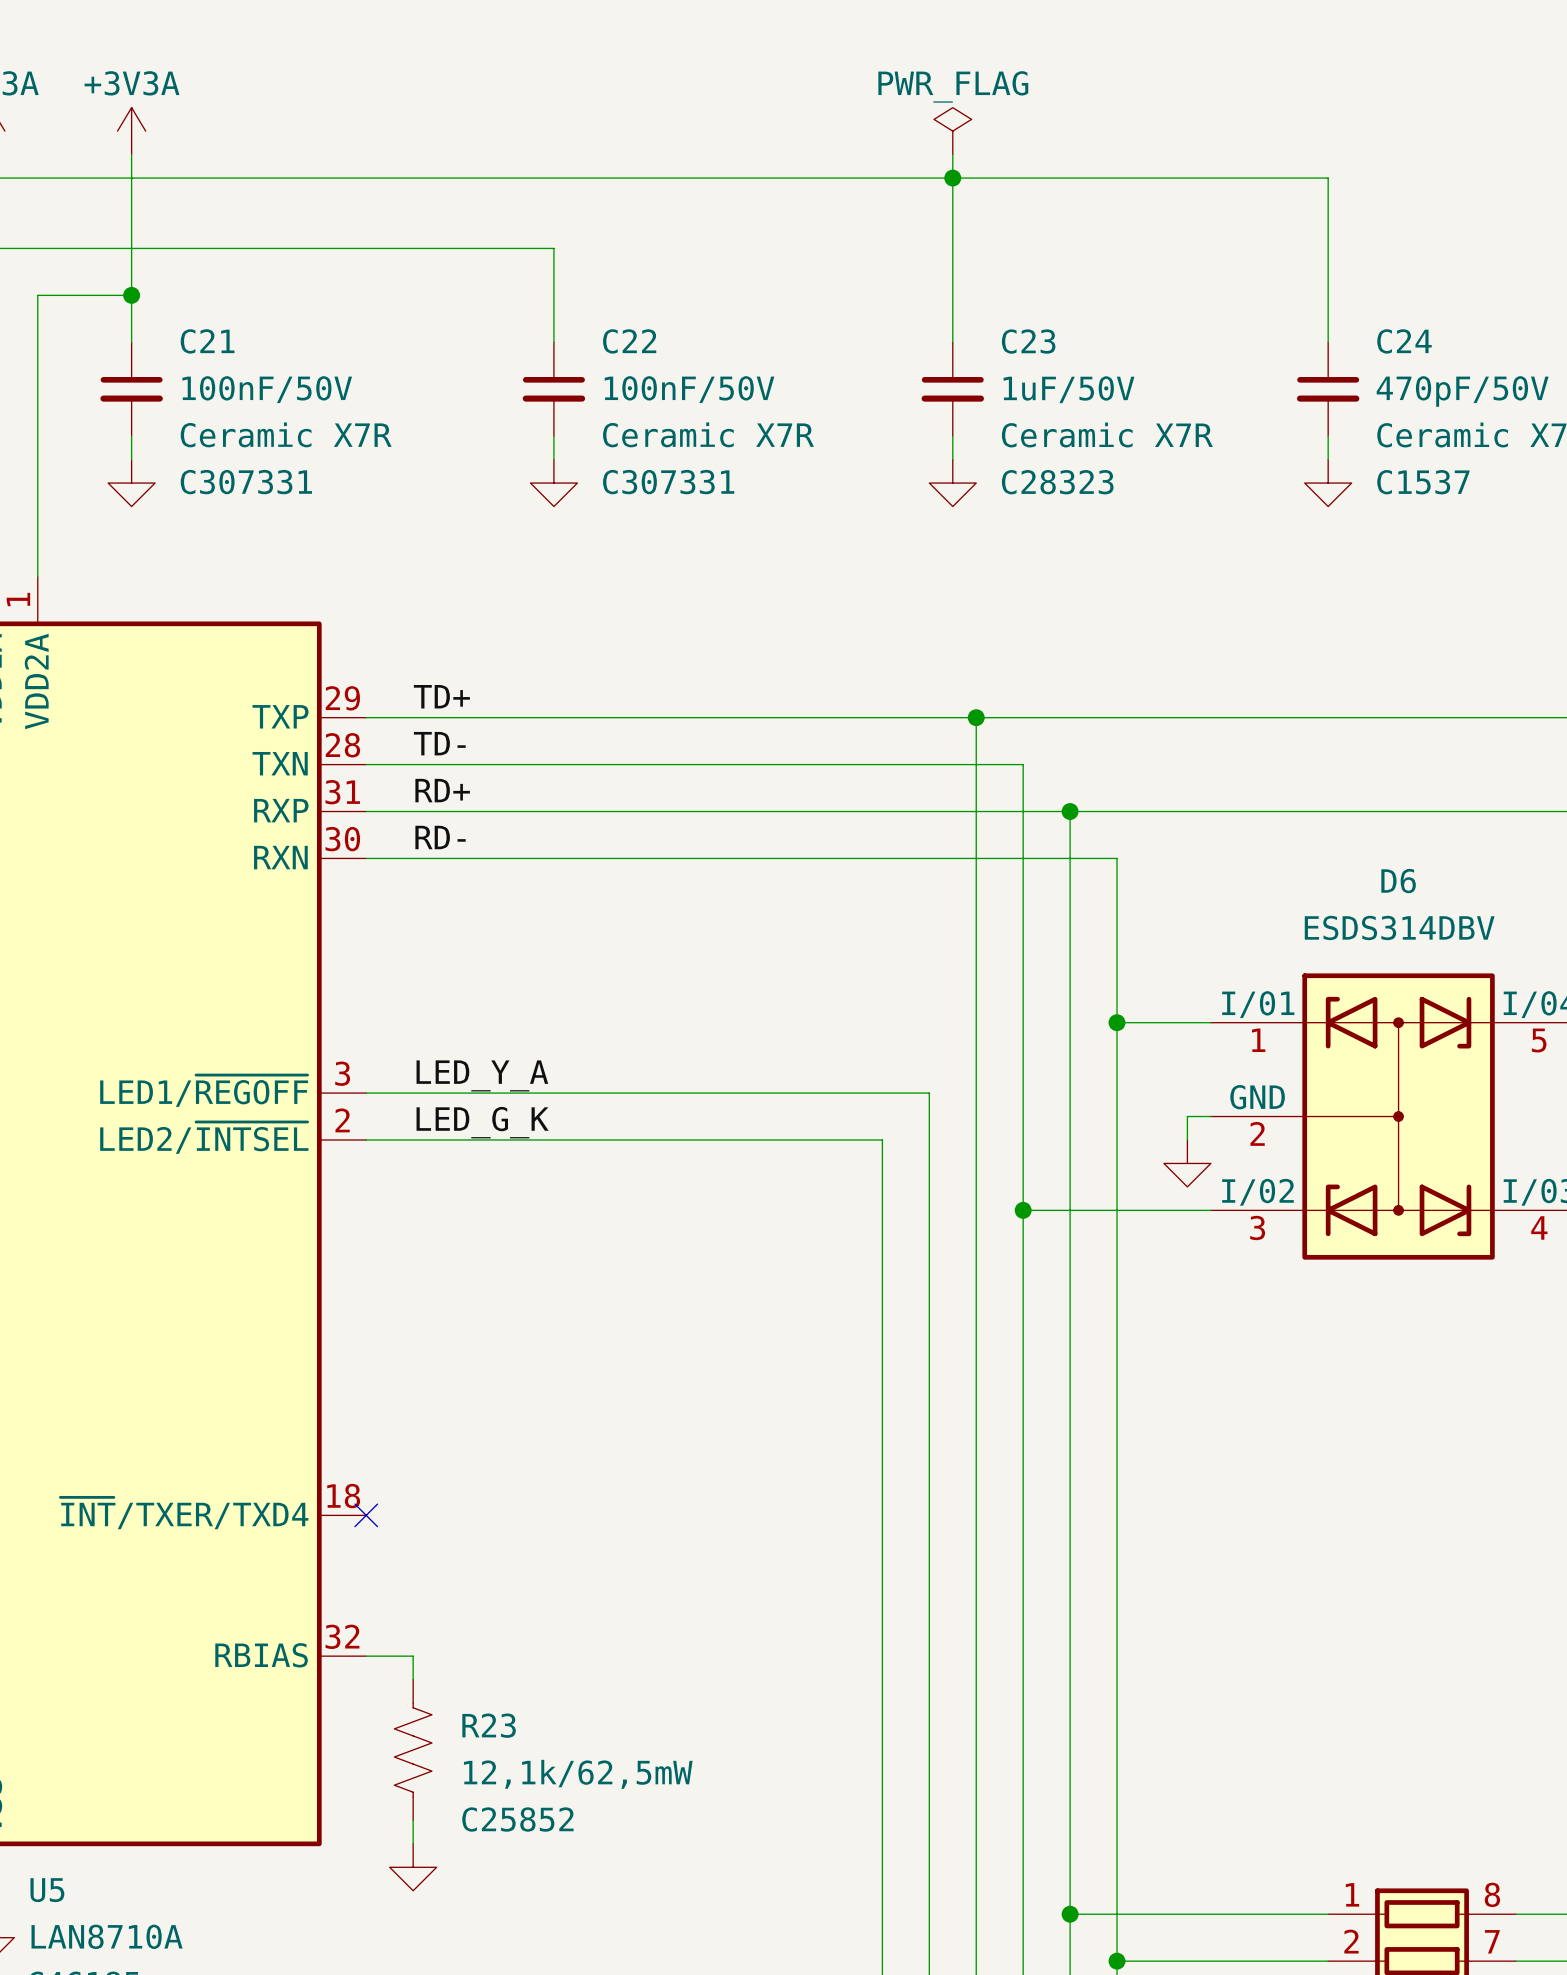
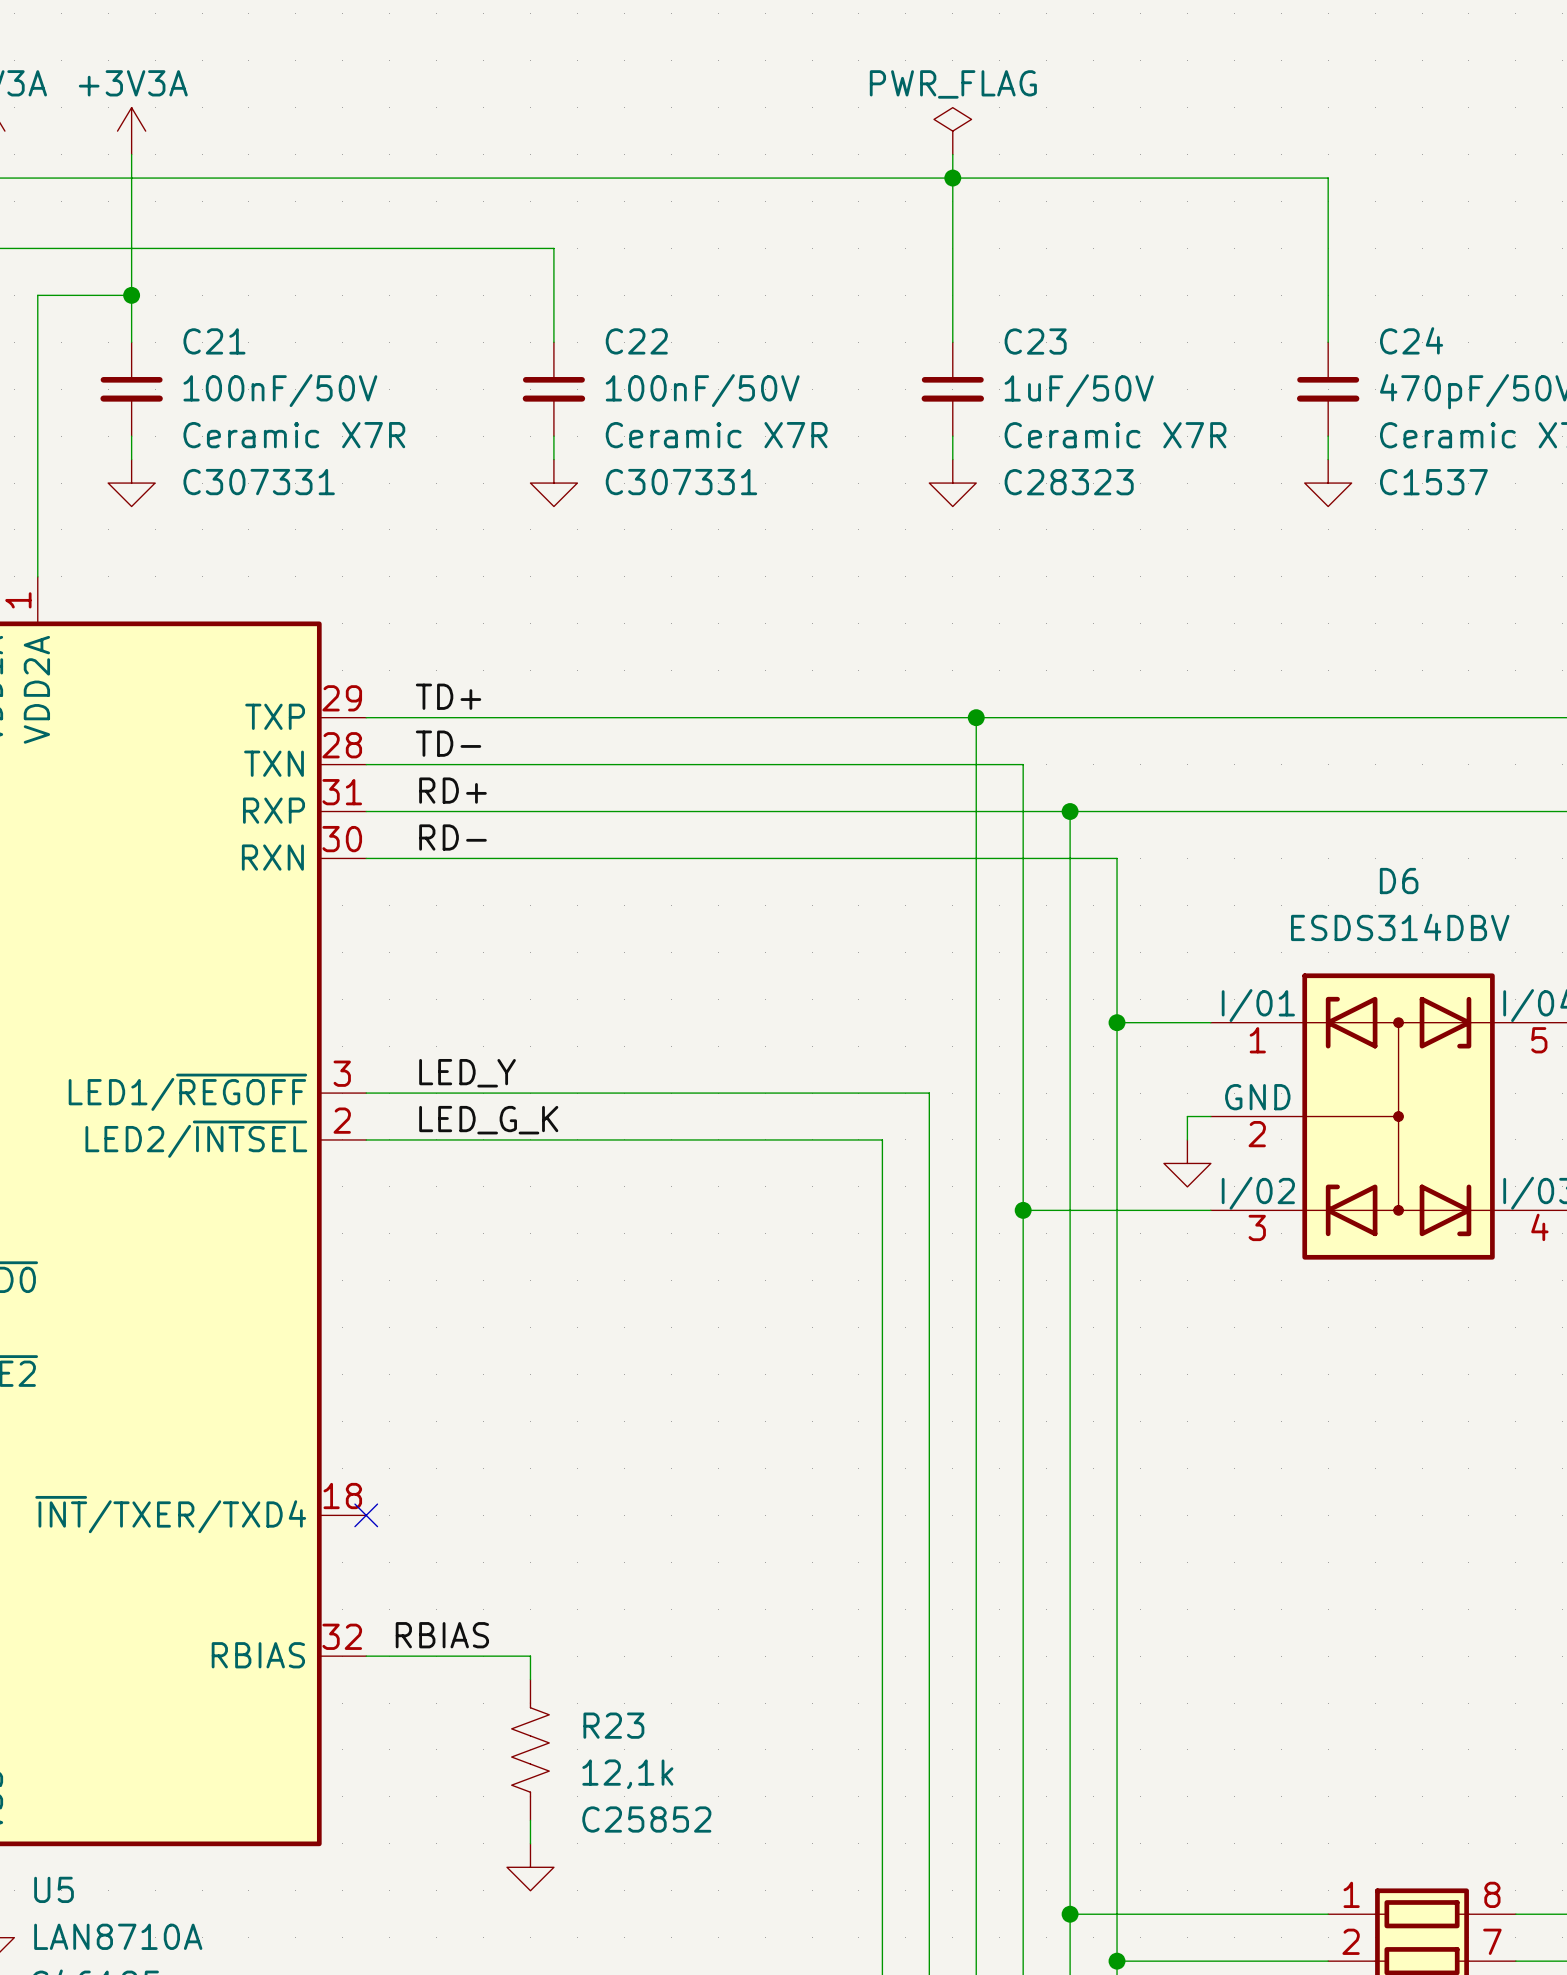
label: LED_Y_A (482, 1075) -> LED_Y (467, 1073)
label: none -> RBIAS (442, 1635)
wire: (413, 1656) (413, 1679) -> (413, 1656) (530, 1656) (530, 1679)
R23 position: (413, 1749) -> (530, 1749)
R23 value: 12,1k/62,5mW (578, 1774) -> 12,1k (627, 1774)
wire: (413, 1820) (413, 1843) -> (530, 1820) (530, 1843)
power symbol position: (413, 1867) -> (530, 1867)

